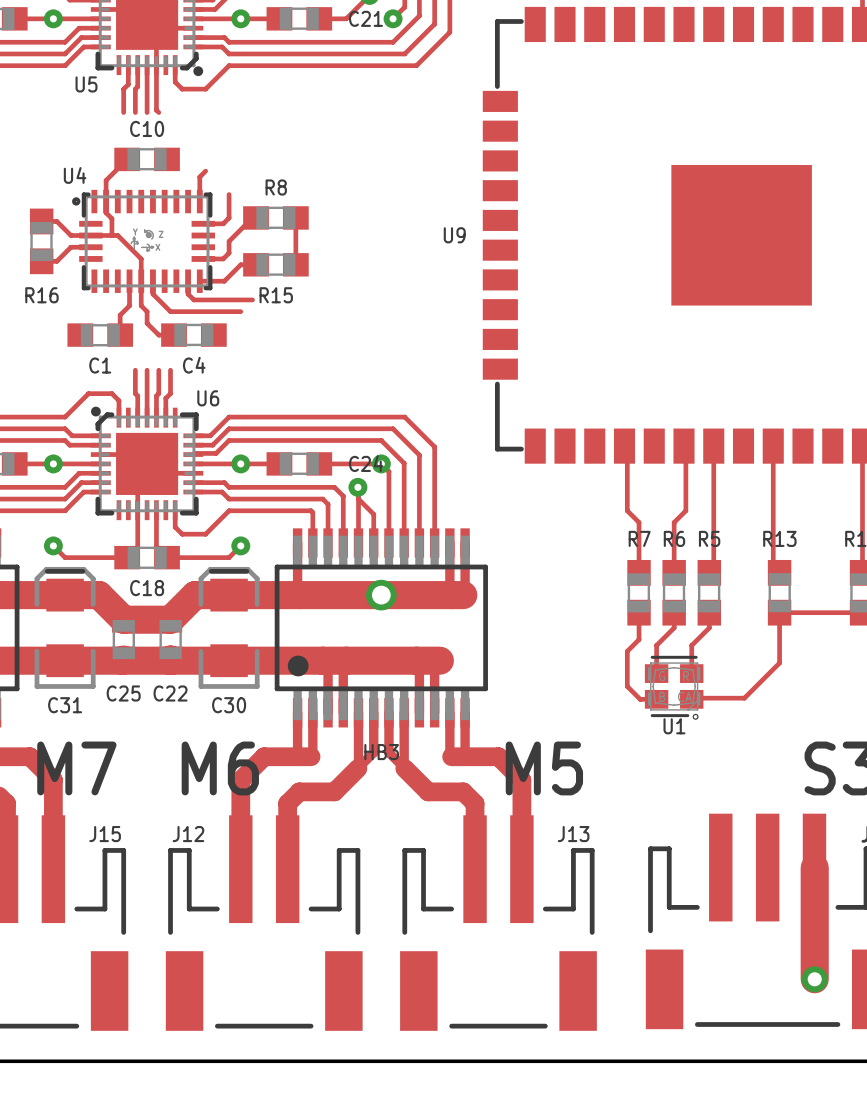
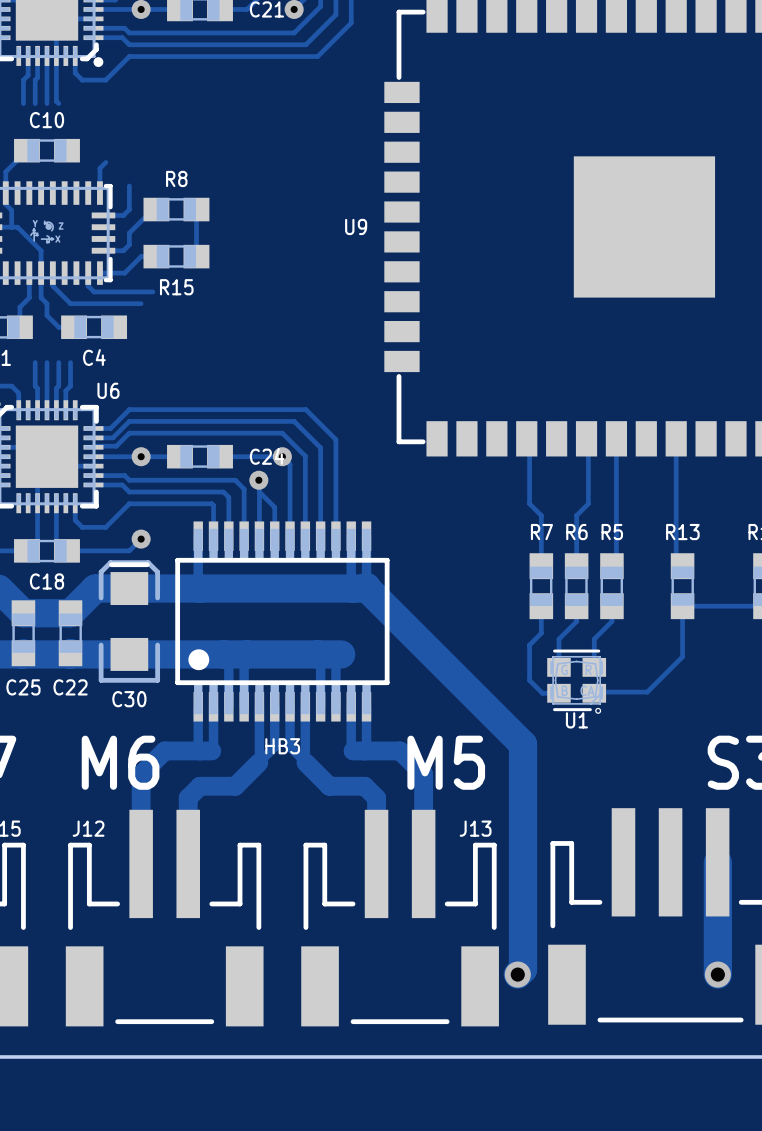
track: none -> (366, 586) (522, 744) (522, 969) (517, 974)
via: (381, 595) -> none
via: none -> (517, 974)

